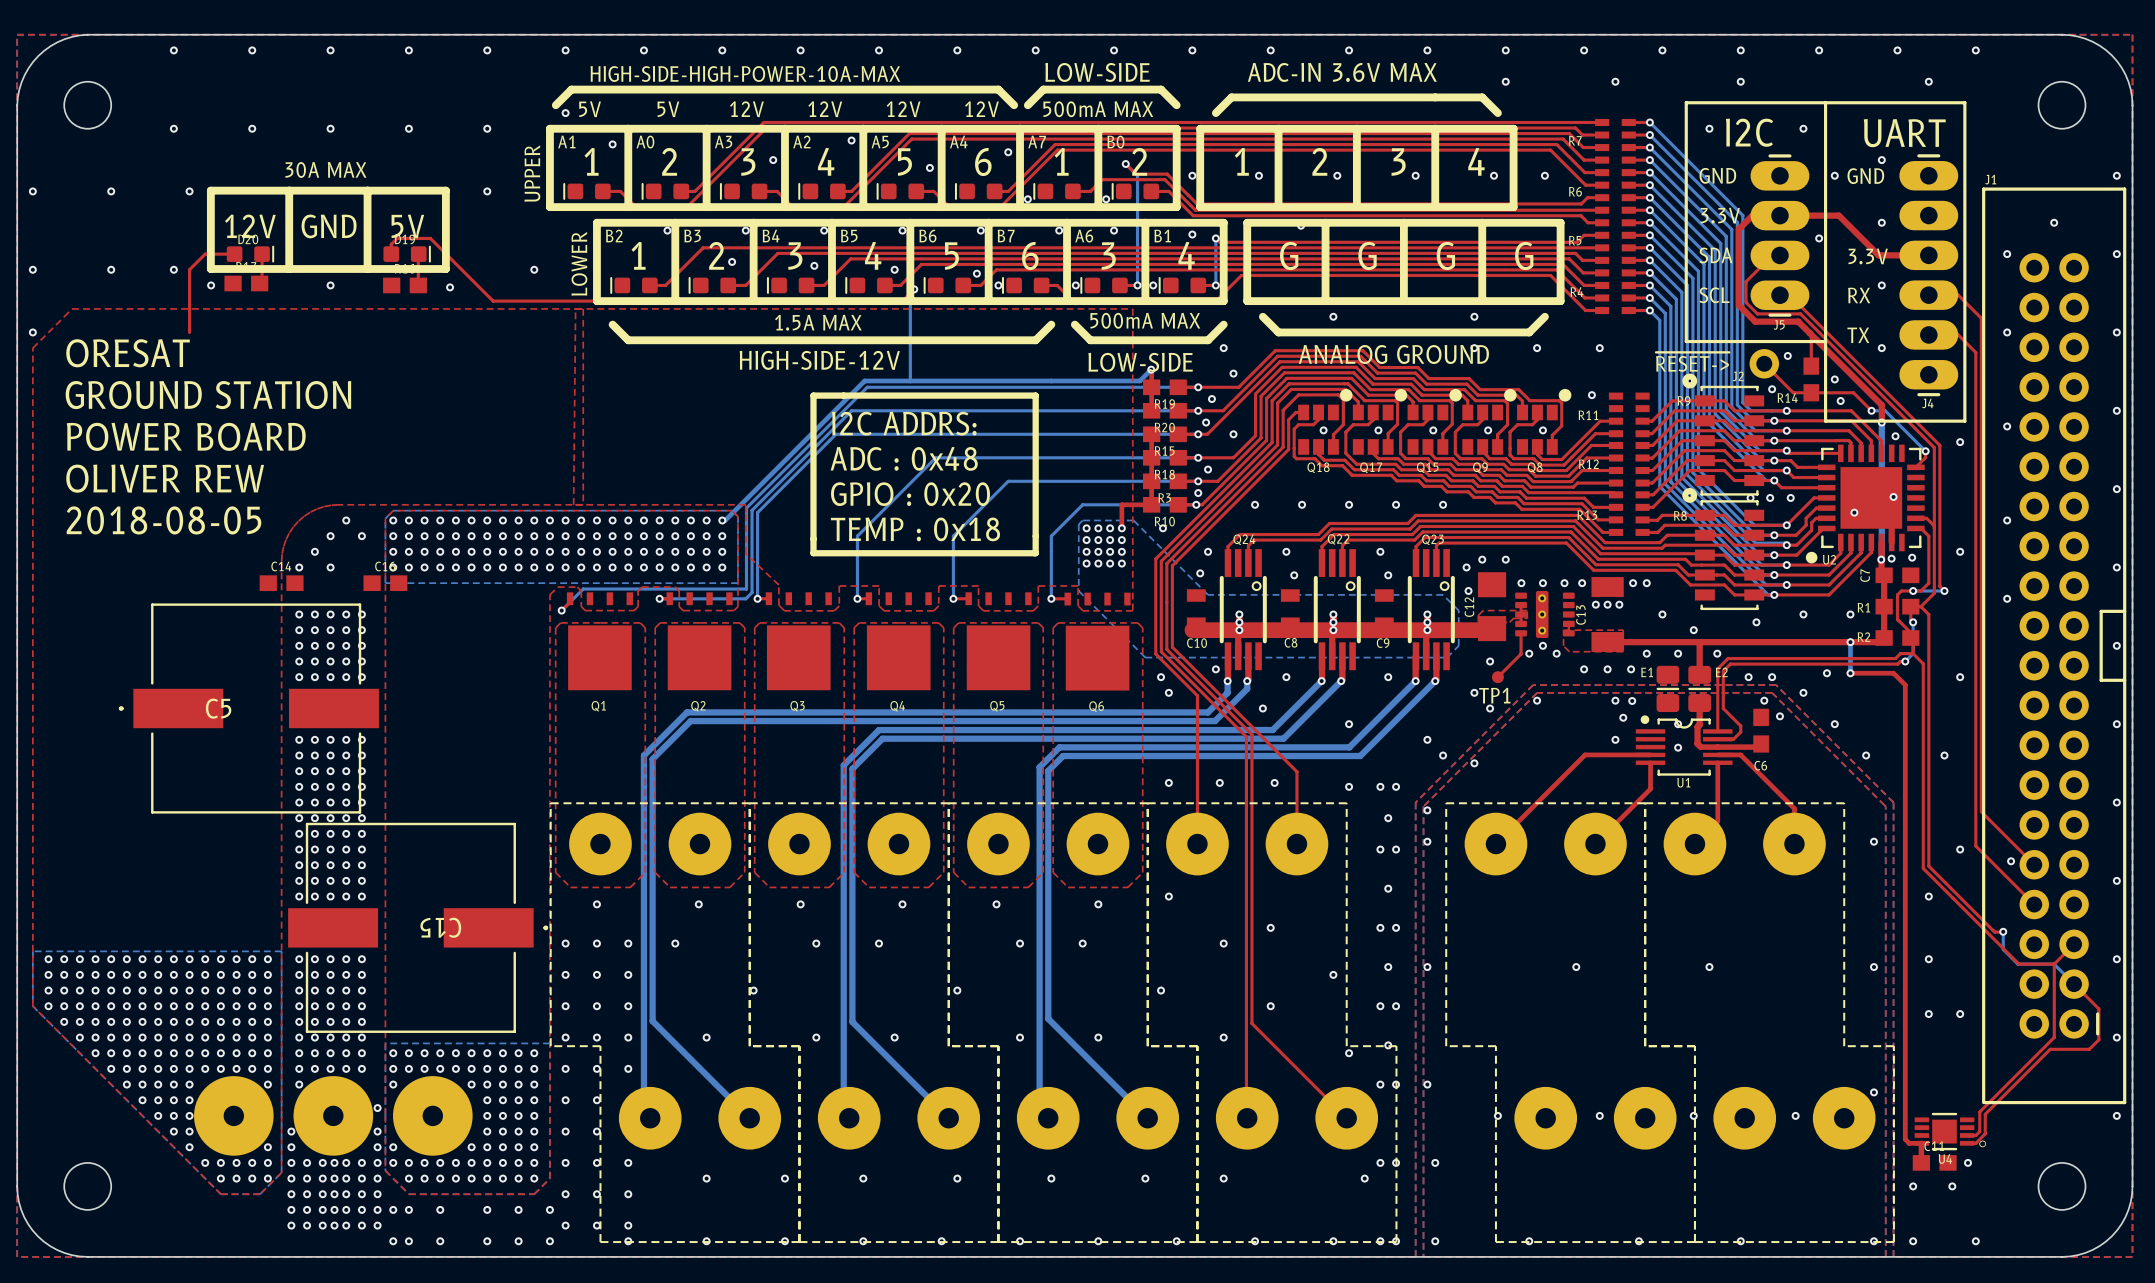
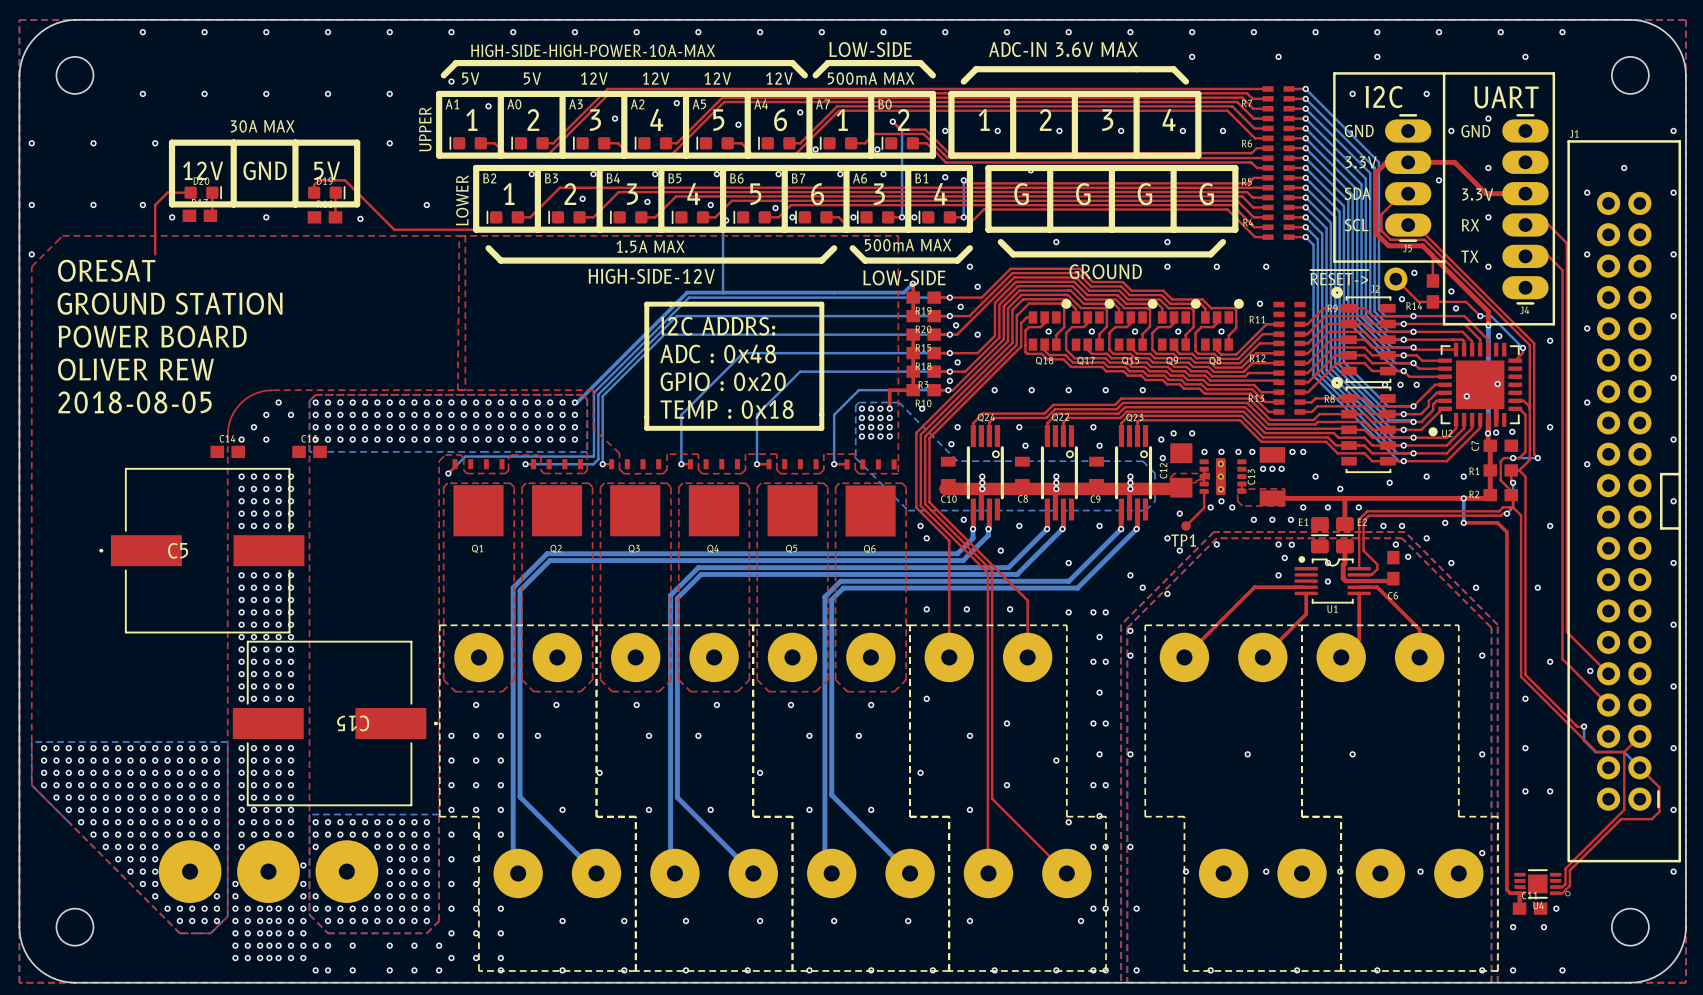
text: ANALOG GROUND (1393, 354) -> GROUND (1105, 271)

